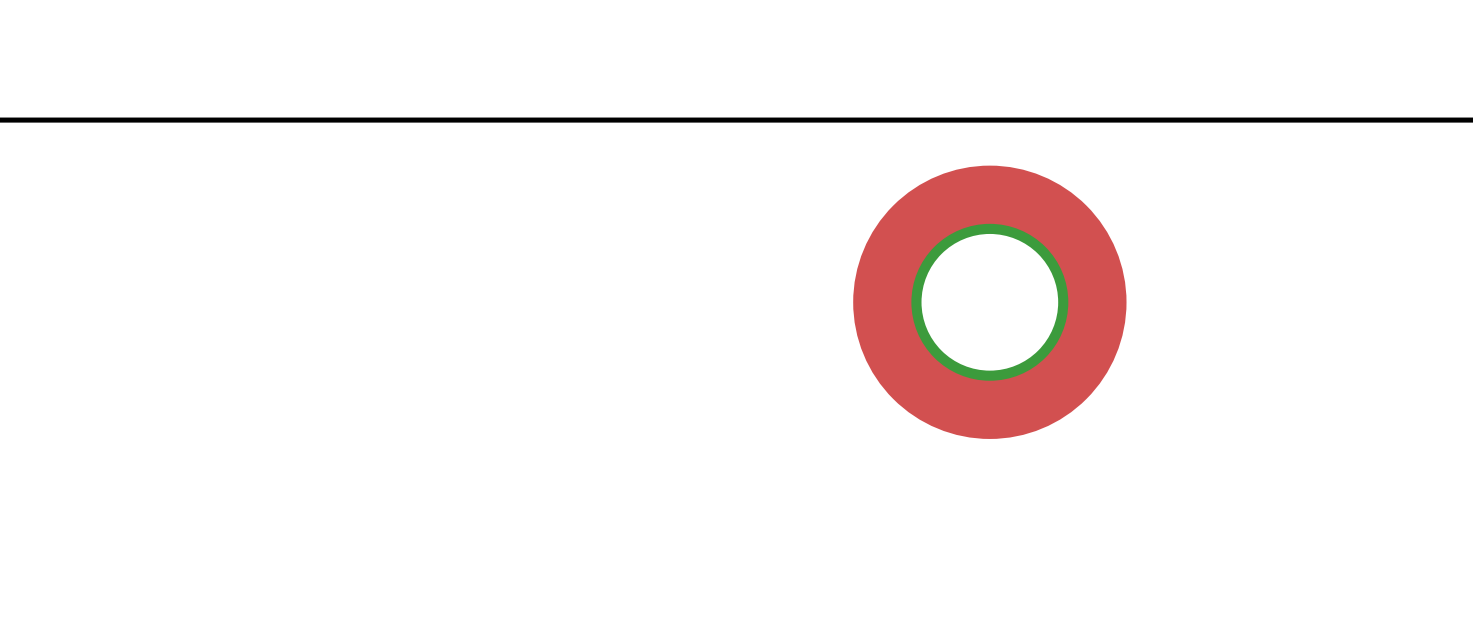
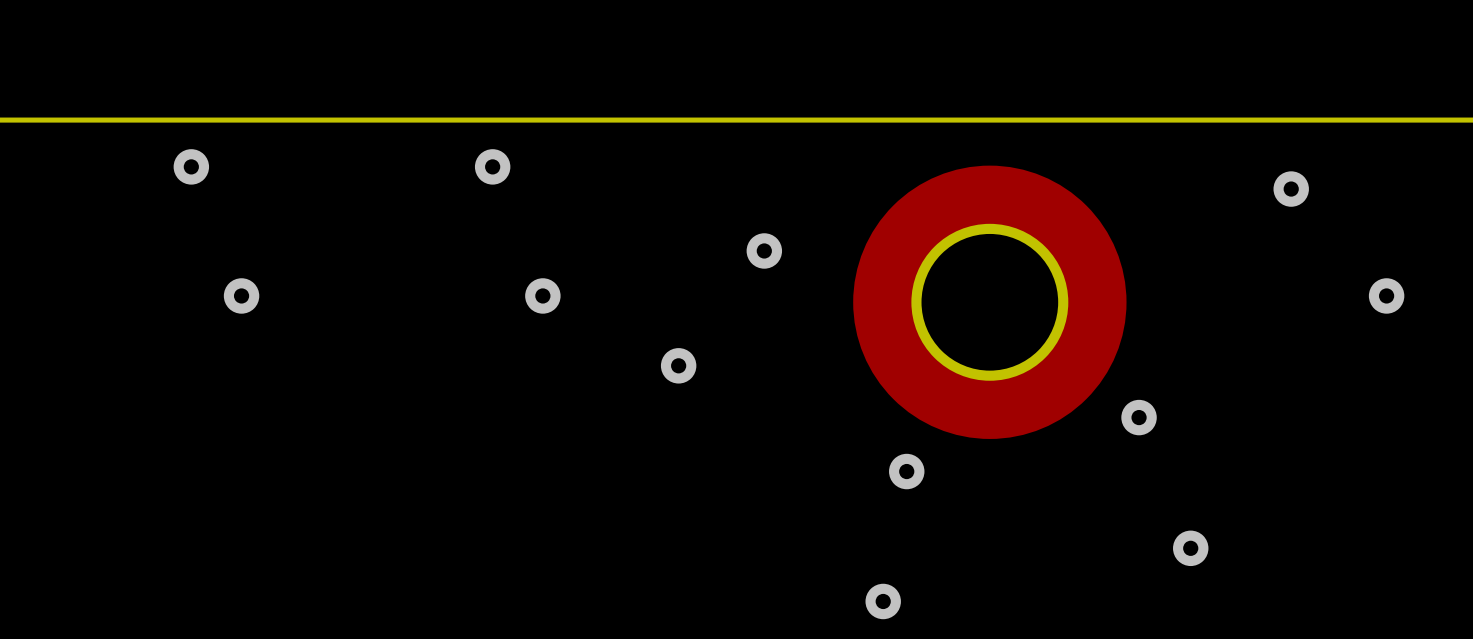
via: none -> (191, 166)
via: none -> (492, 166)
via: none -> (1291, 189)
via: none -> (764, 250)
via: none -> (241, 295)
via: none -> (542, 295)
via: none -> (1386, 295)
via: none -> (678, 365)
via: none -> (1139, 417)
via: none -> (906, 471)
via: none -> (1190, 548)
via: none -> (883, 601)

